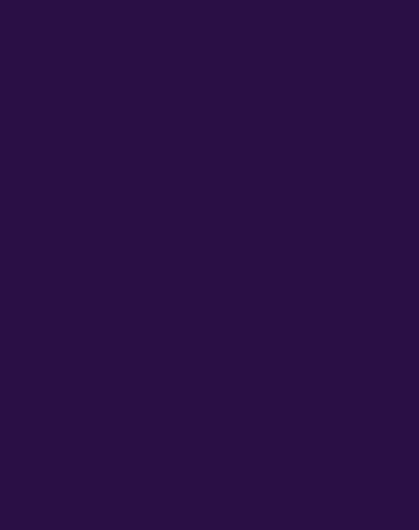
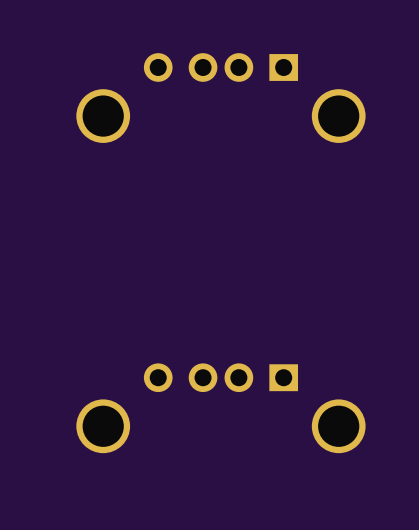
part: none -> (220, 98)
part: none -> (220, 408)

